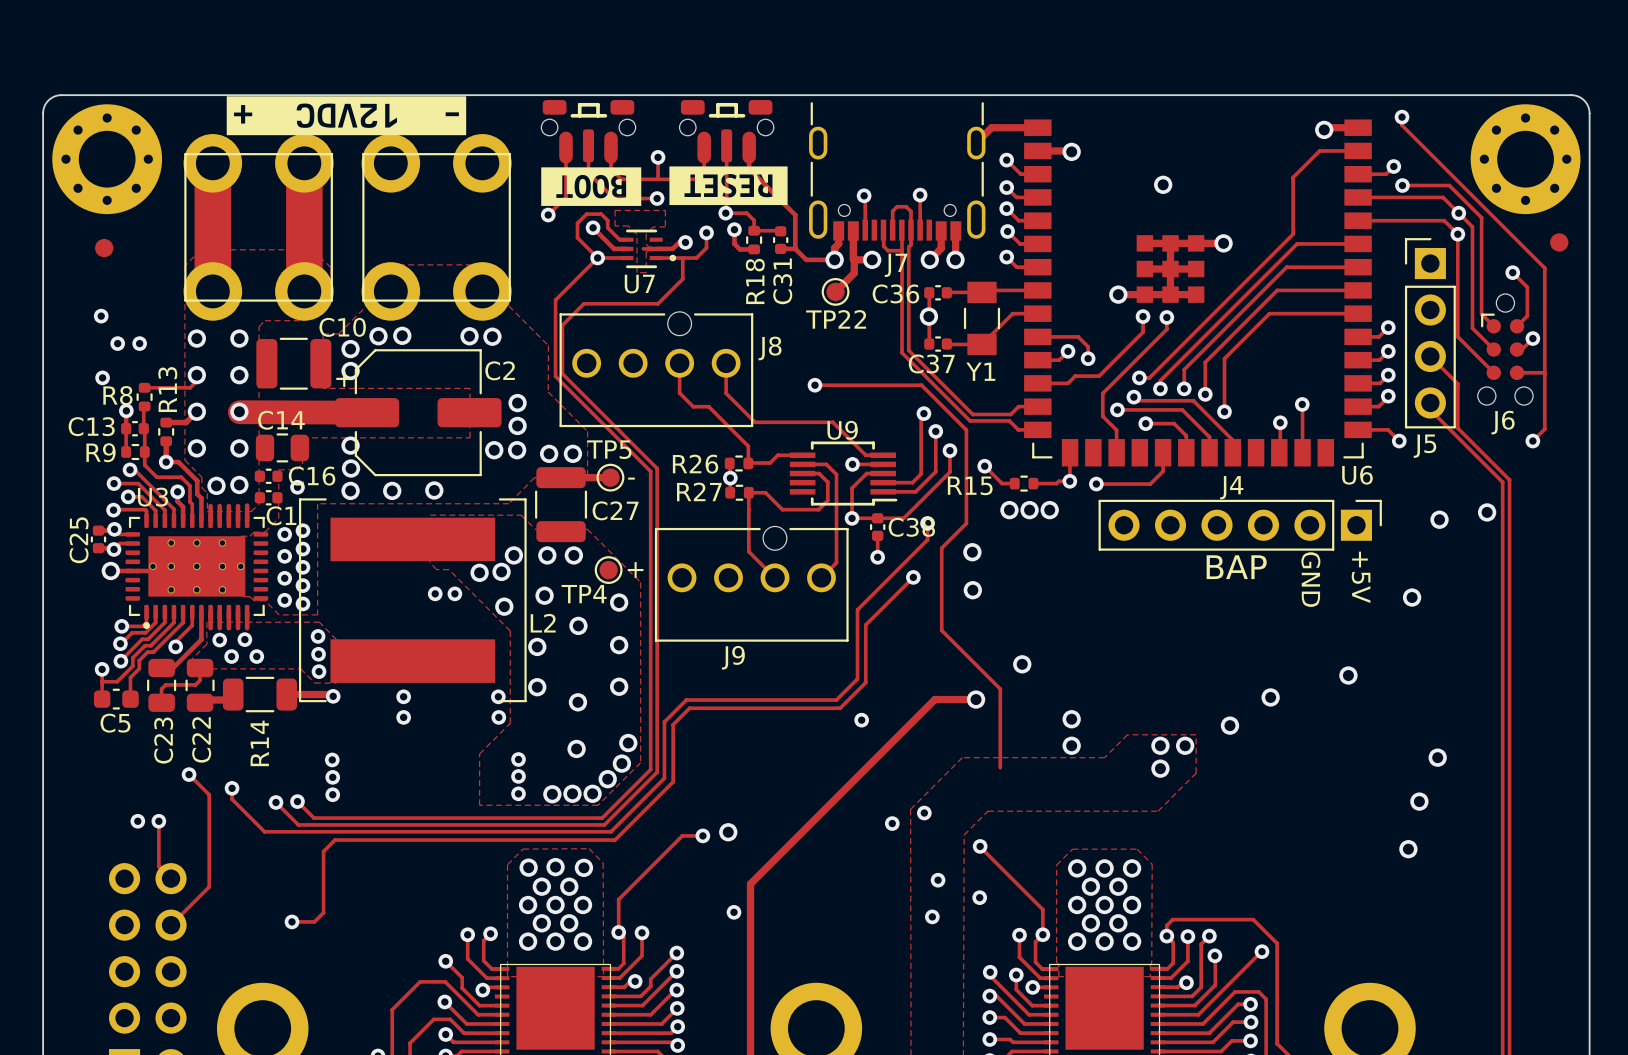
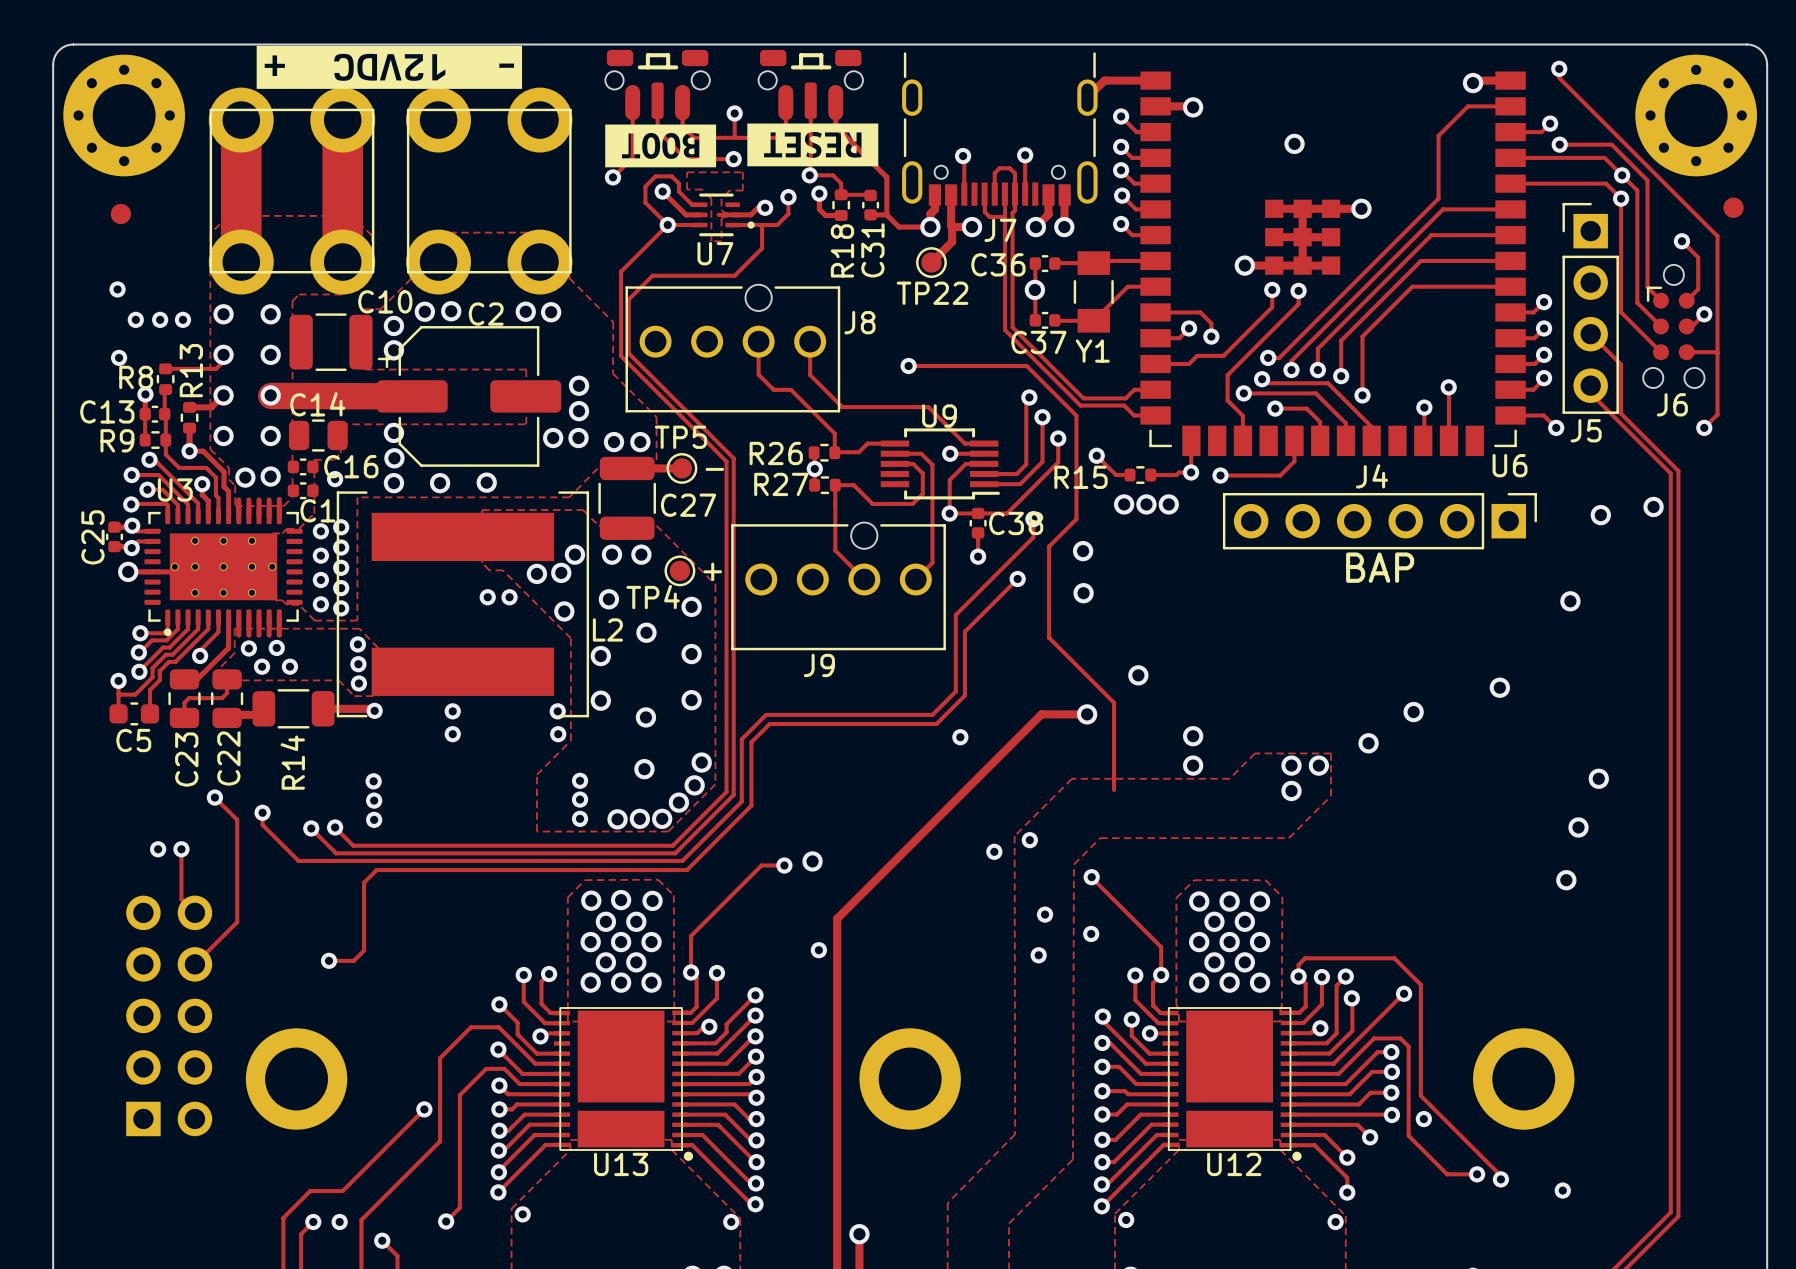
via: none -> (182, 319)
C2 name position: C2 (500, 370) -> C2 (486, 314)
text: +5V (1361, 577) -> none
text: GND (1310, 579) -> none

